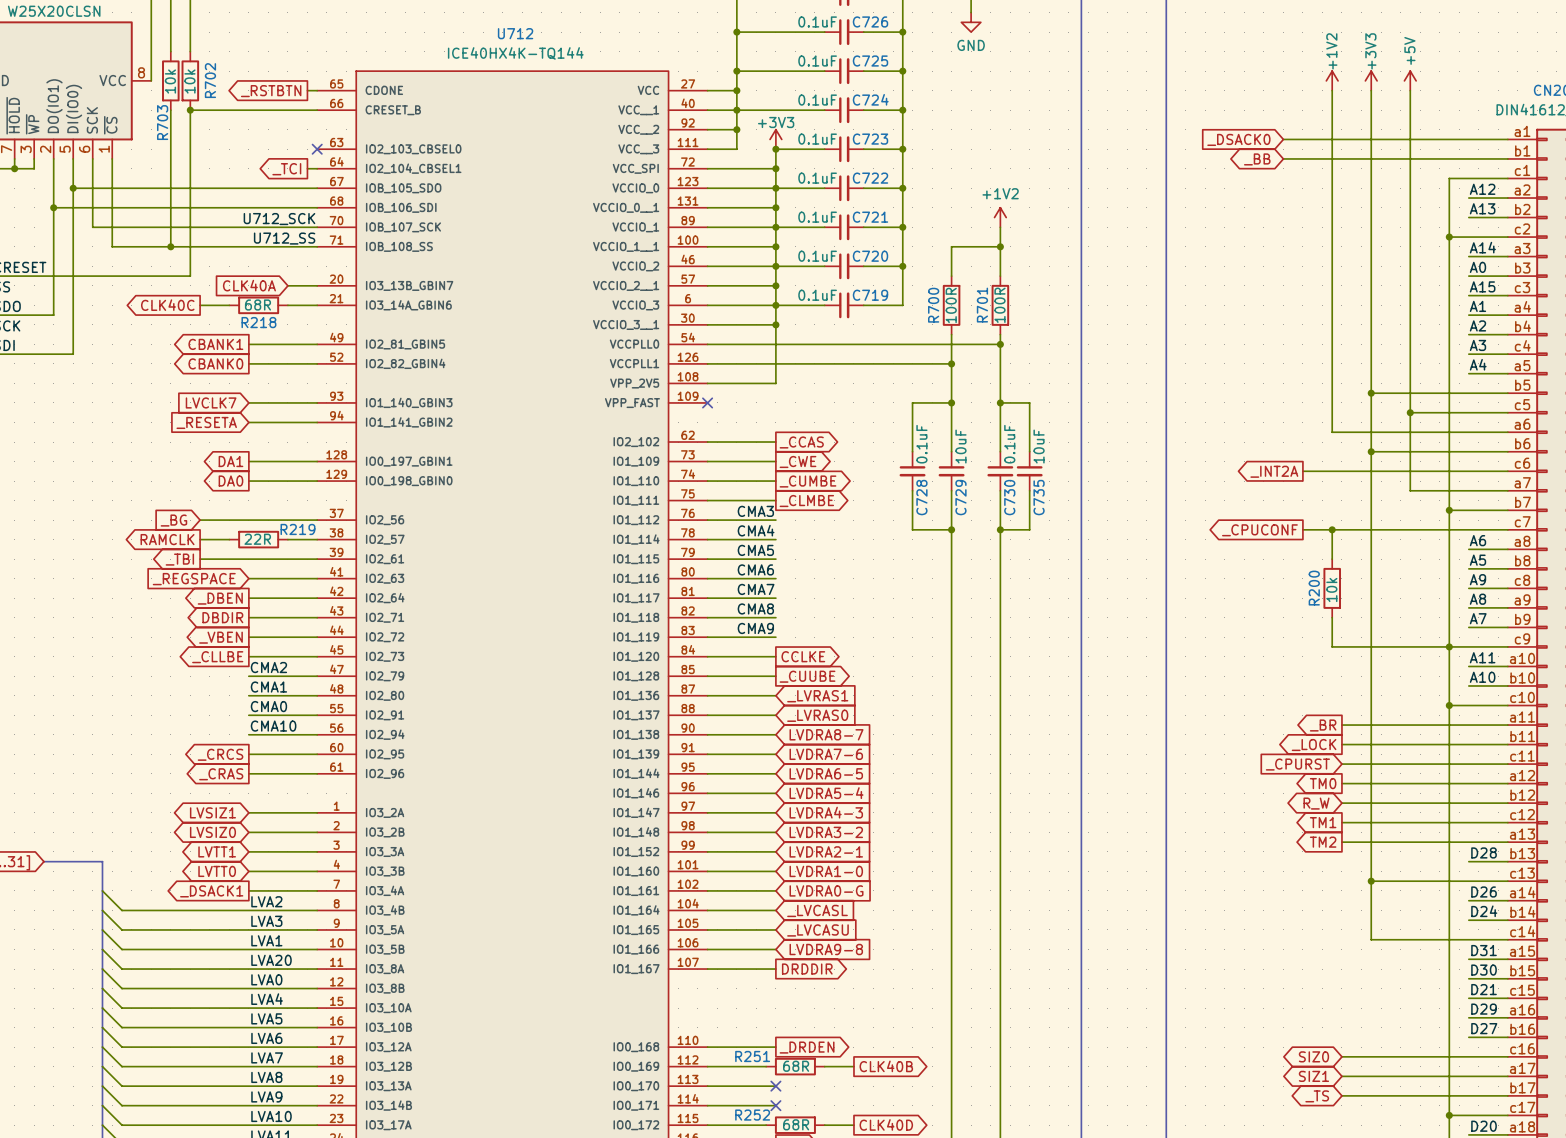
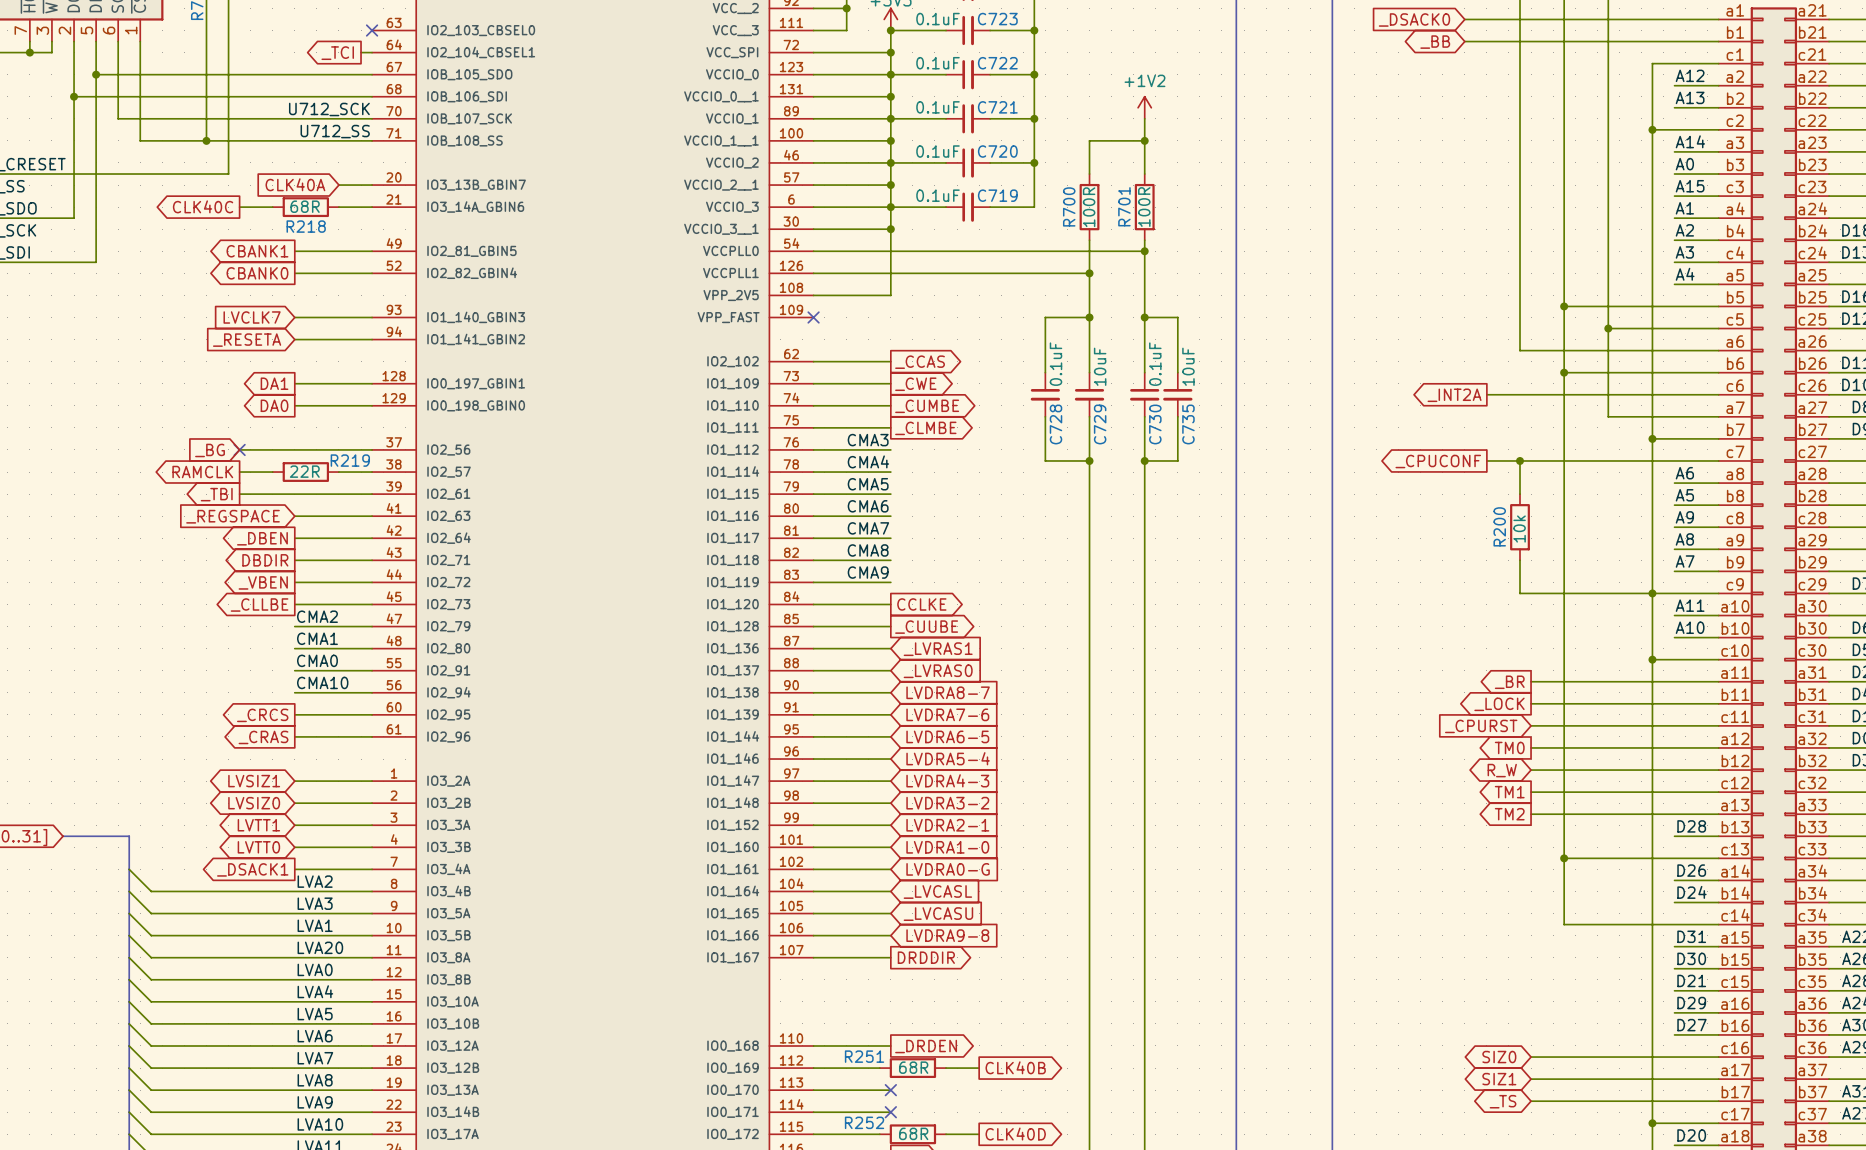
no-connect mark: none -> (239, 449)

